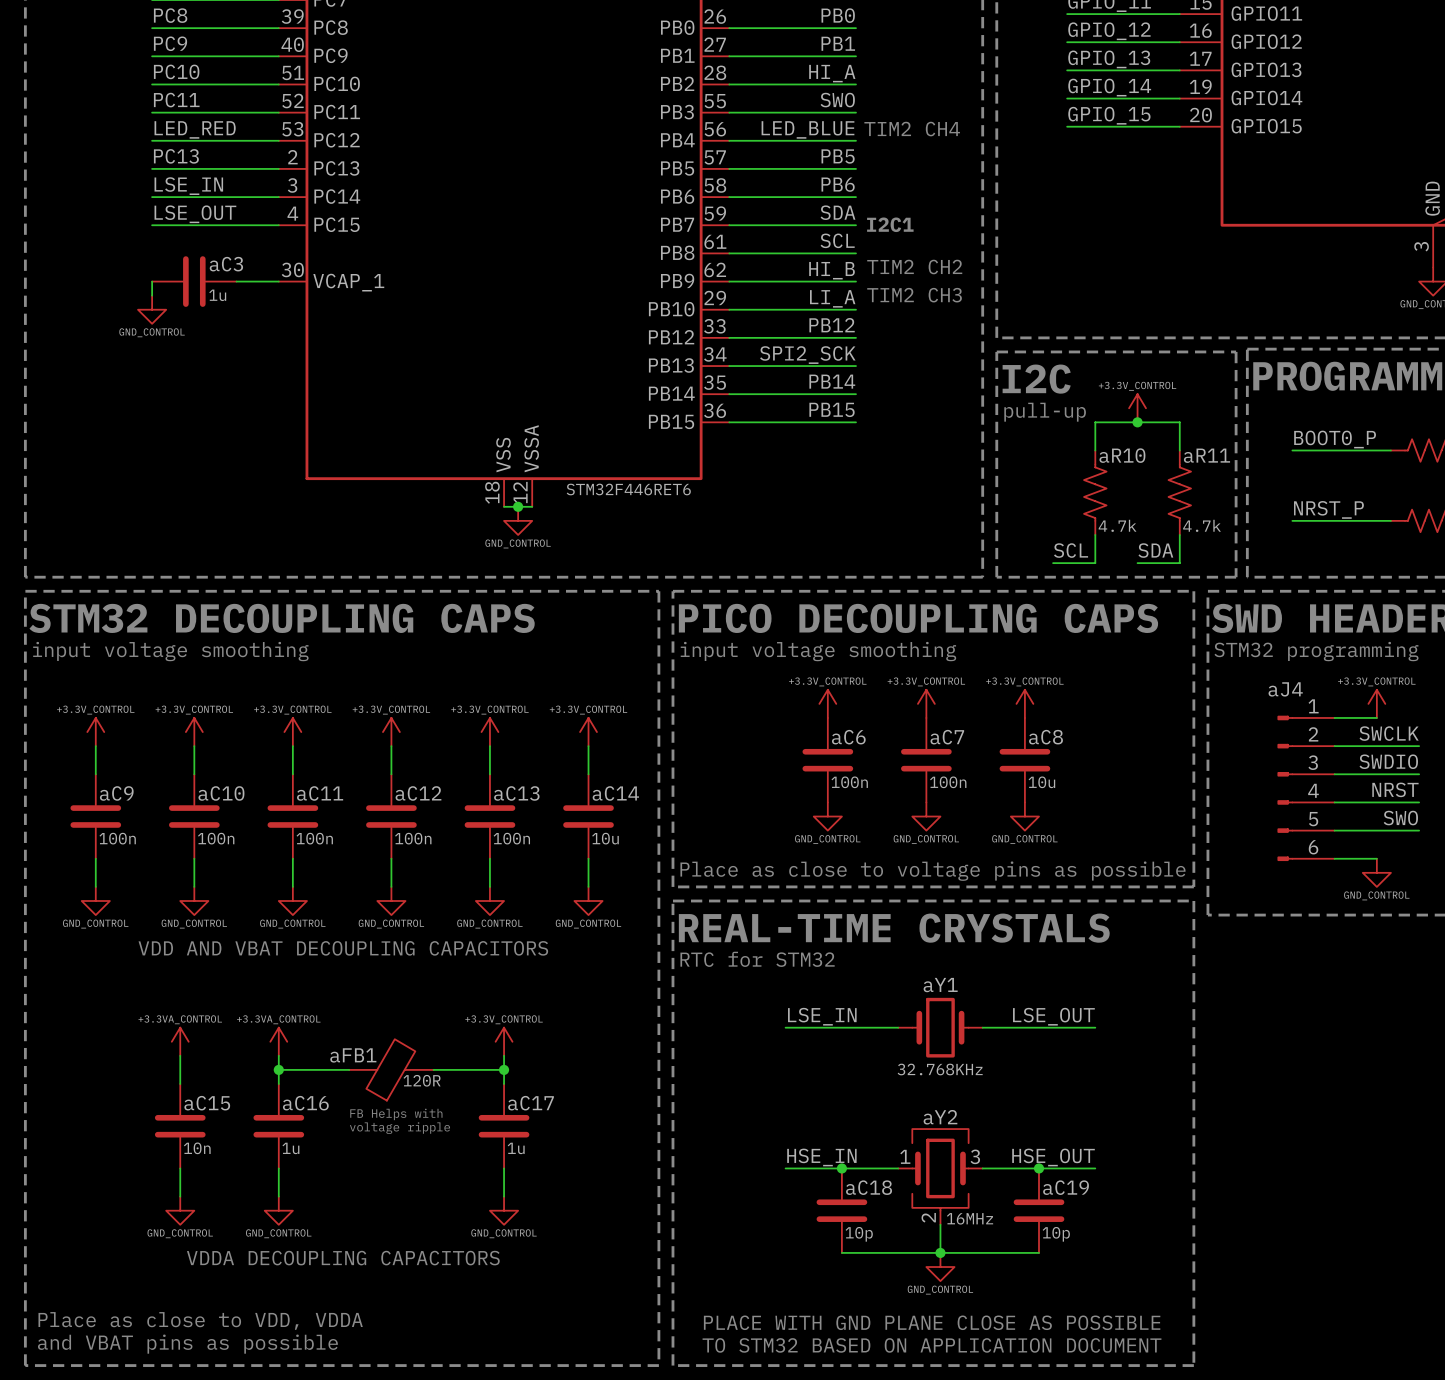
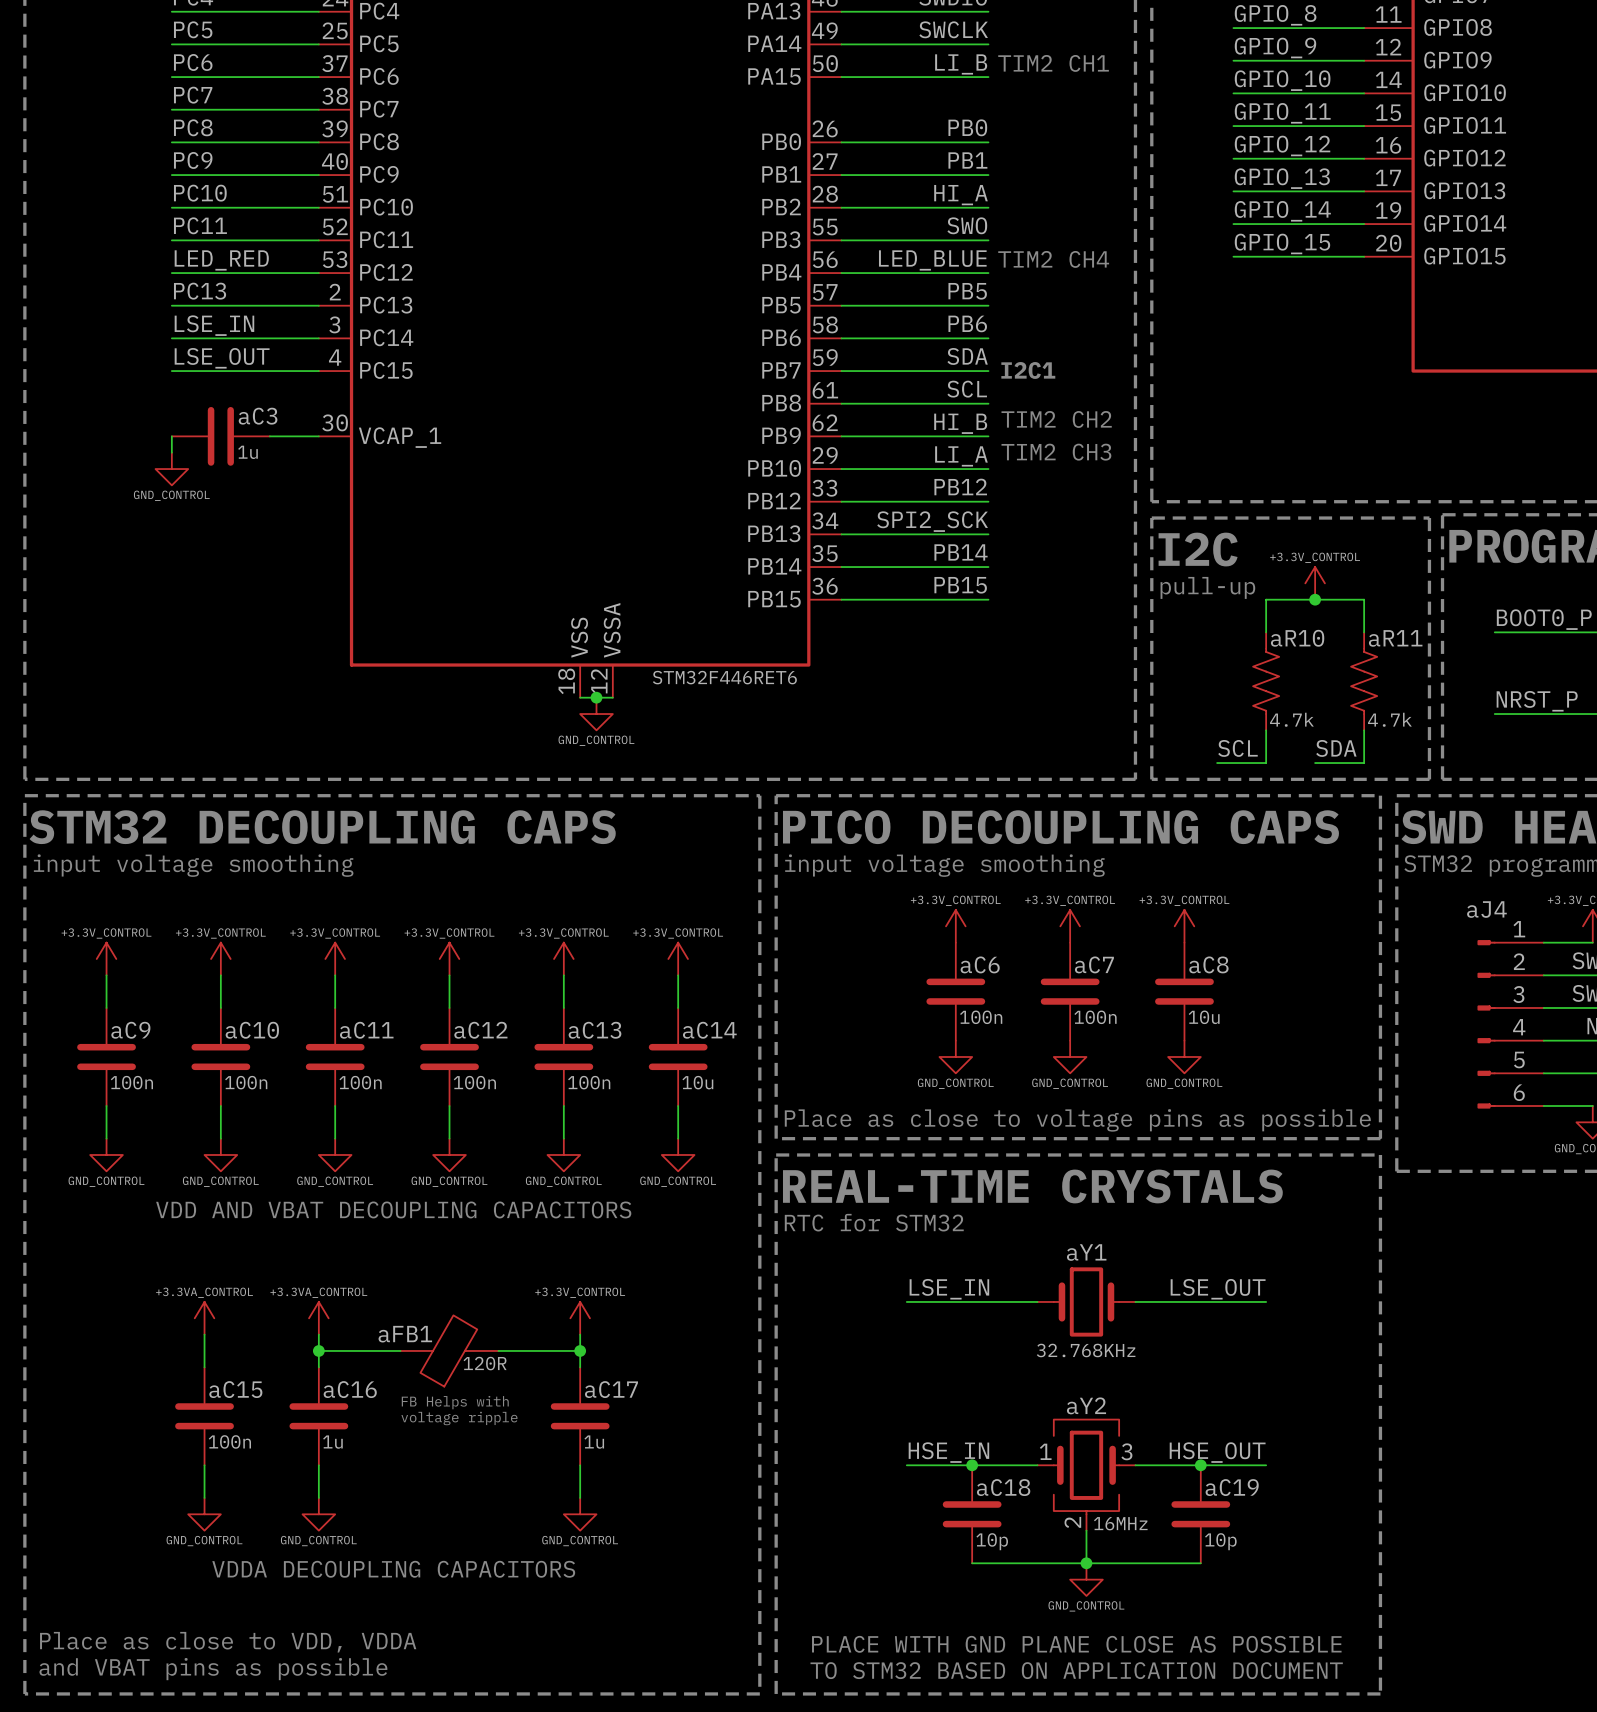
aC15 value: 10n (197, 1148) -> 100n (229, 1441)

